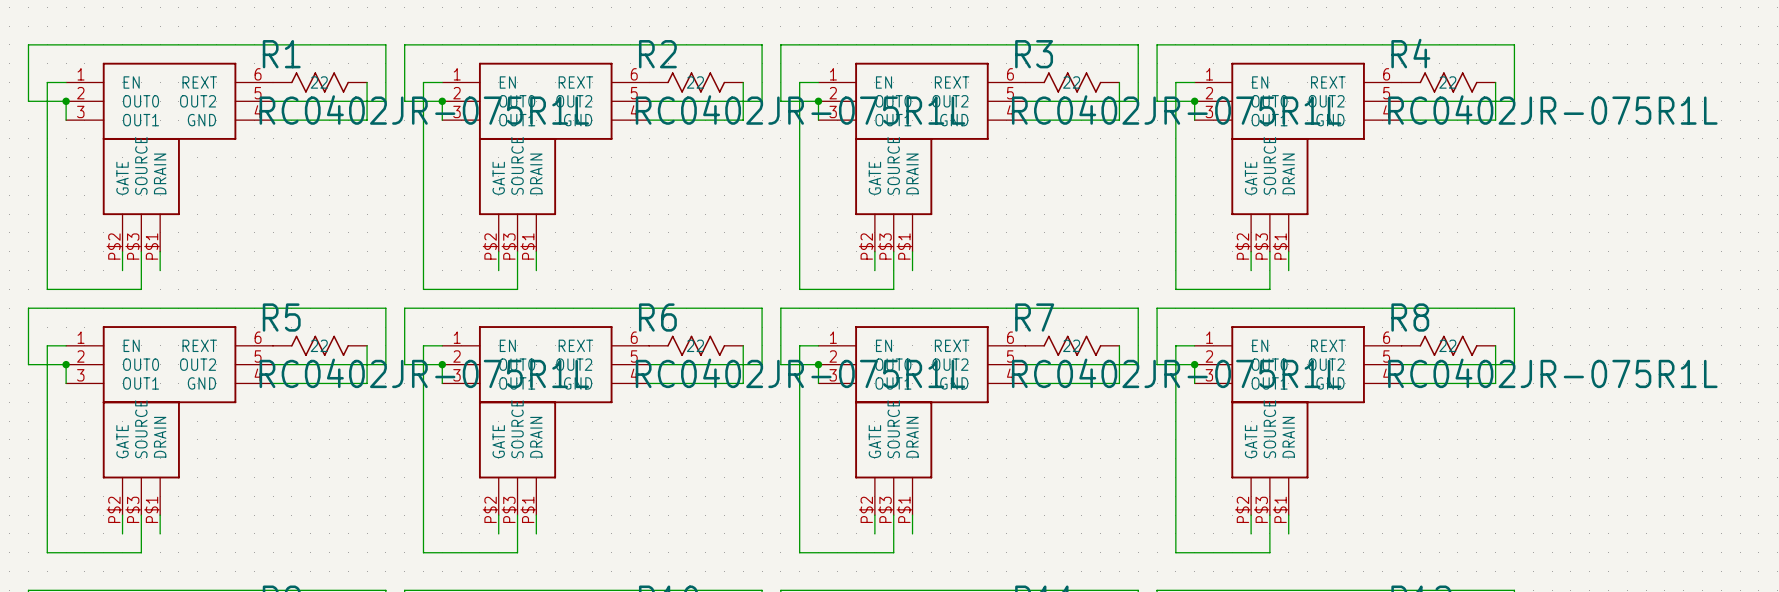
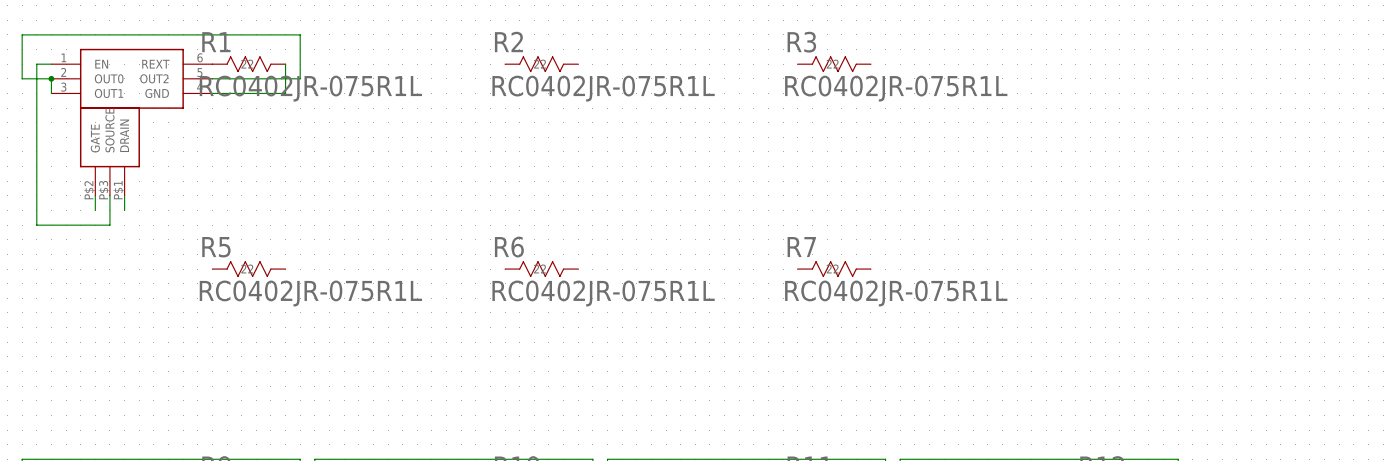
wire: (442, 82) (423, 82) (423, 289) (517, 289) (517, 251) -> none
wire: (743, 82) (743, 120) (649, 120) -> none
wire: (818, 82) (799, 82) (799, 289) (893, 289) (893, 251) -> none
wire: (1119, 82) (1119, 120) (1025, 120) -> none
wire: (1194, 82) (1175, 82) (1175, 289) (1269, 289) (1269, 251) -> none
R4: RC0402JR-075R1L (1448, 82) -> none
wire: (1495, 82) (1495, 120) (1401, 120) -> none
junction: (442, 101) -> none
part: (545, 101) -> none
wire: (649, 101) (762, 101) (762, 44) (404, 44) (404, 101) (442, 101) (442, 120) -> none
junction: (818, 101) -> none
part: (921, 101) -> none
wire: (1025, 101) (1138, 101) (1138, 44) (780, 44) (780, 101) (818, 101) (818, 120) -> none
junction: (1194, 101) -> none
part: (1298, 101) -> none
wire: (1401, 101) (1514, 101) (1514, 44) (1157, 44) (1157, 101) (1194, 101) (1194, 120) -> none
part: (517, 194) -> none
part: (893, 194) -> none
part: (1269, 194) -> none
wire: (498, 251) (498, 270) -> none
wire: (536, 251) (536, 270) -> none
wire: (874, 251) (874, 270) -> none
wire: (912, 251) (912, 270) -> none
wire: (1251, 251) (1251, 270) -> none
wire: (1288, 251) (1288, 270) -> none
wire: (66, 345) (47, 345) (47, 552) (141, 552) (141, 515) -> none
wire: (367, 345) (367, 383) (273, 383) -> none
wire: (442, 345) (423, 345) (423, 552) (517, 552) (517, 515) -> none
wire: (743, 345) (743, 383) (649, 383) -> none
wire: (818, 345) (799, 345) (799, 552) (893, 552) (893, 515) -> none
wire: (1119, 345) (1119, 383) (1025, 383) -> none
wire: (1194, 345) (1175, 345) (1175, 552) (1269, 552) (1269, 515) -> none
R8: RC0402JR-075R1L (1448, 345) -> none
wire: (1495, 345) (1495, 383) (1401, 383) -> none
junction: (66, 364) -> none
part: (169, 364) -> none
wire: (273, 364) (385, 364) (385, 308) (28, 308) (28, 364) (66, 364) (66, 383) -> none
junction: (442, 364) -> none
part: (545, 364) -> none
wire: (649, 364) (762, 364) (762, 308) (404, 308) (404, 364) (442, 364) (442, 383) -> none
junction: (818, 364) -> none
part: (921, 364) -> none
wire: (1025, 364) (1138, 364) (1138, 308) (780, 308) (780, 364) (818, 364) (818, 383) -> none
junction: (1194, 364) -> none
part: (1298, 364) -> none
wire: (1401, 364) (1514, 364) (1514, 308) (1157, 308) (1157, 364) (1194, 364) (1194, 383) -> none
part: (141, 458) -> none
part: (517, 458) -> none
part: (893, 458) -> none
part: (1269, 458) -> none
wire: (122, 515) (122, 533) -> none
wire: (160, 515) (160, 533) -> none
wire: (498, 515) (498, 533) -> none
wire: (536, 515) (536, 533) -> none
wire: (874, 515) (874, 533) -> none
wire: (912, 515) (912, 533) -> none
wire: (1251, 515) (1251, 533) -> none
wire: (1288, 515) (1288, 533) -> none

